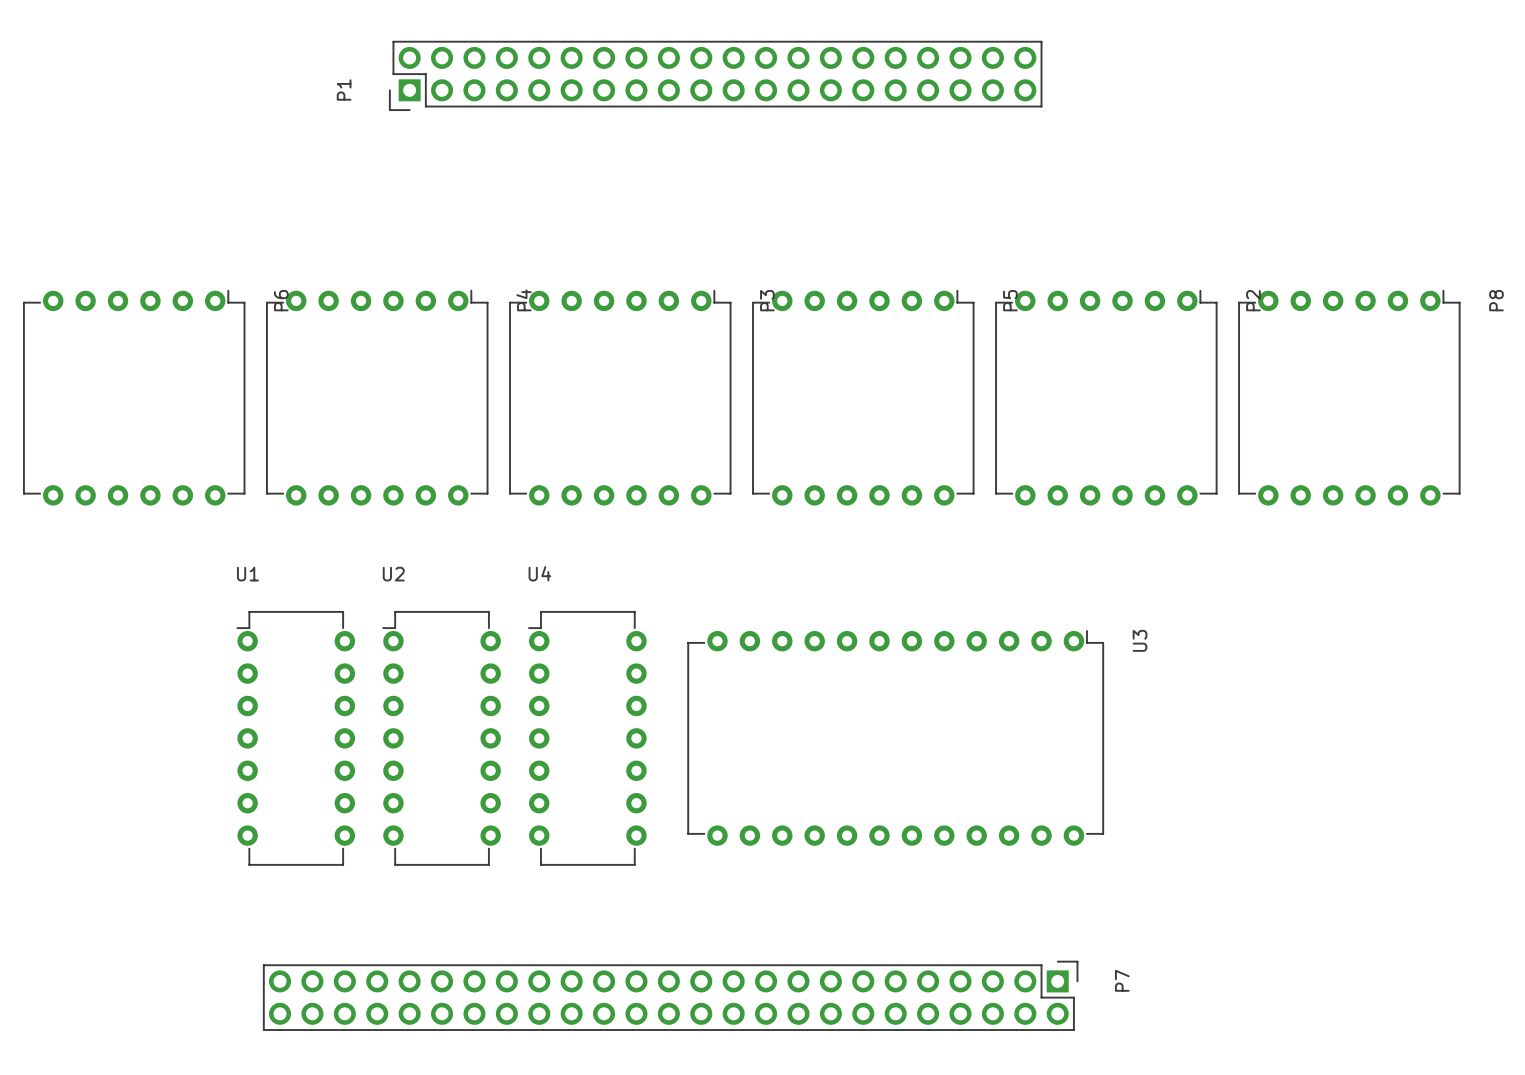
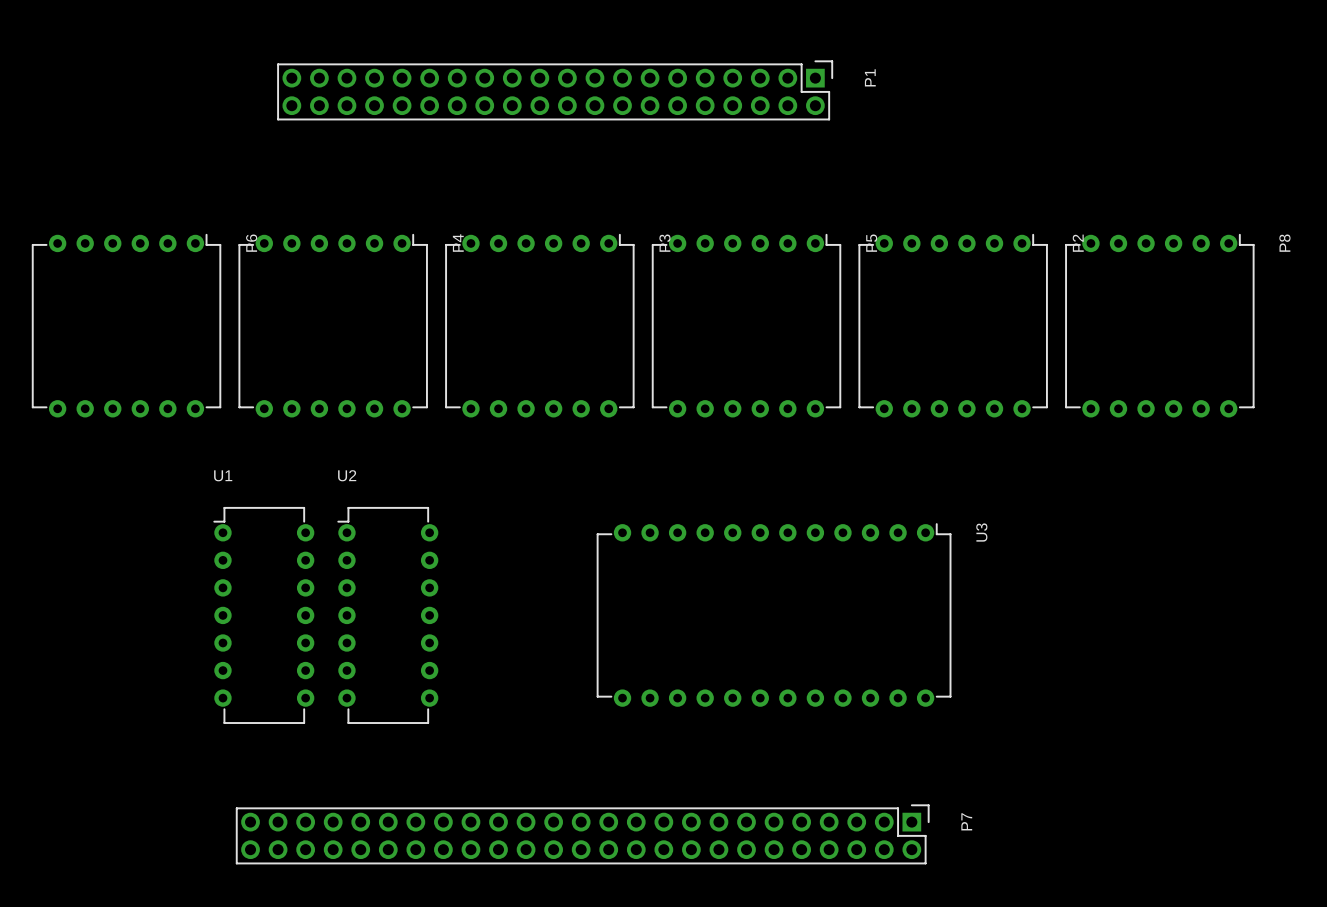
P1 rotation: 0° (715, 75) -> 180° (555, 90)
U4: (587, 738) -> none

